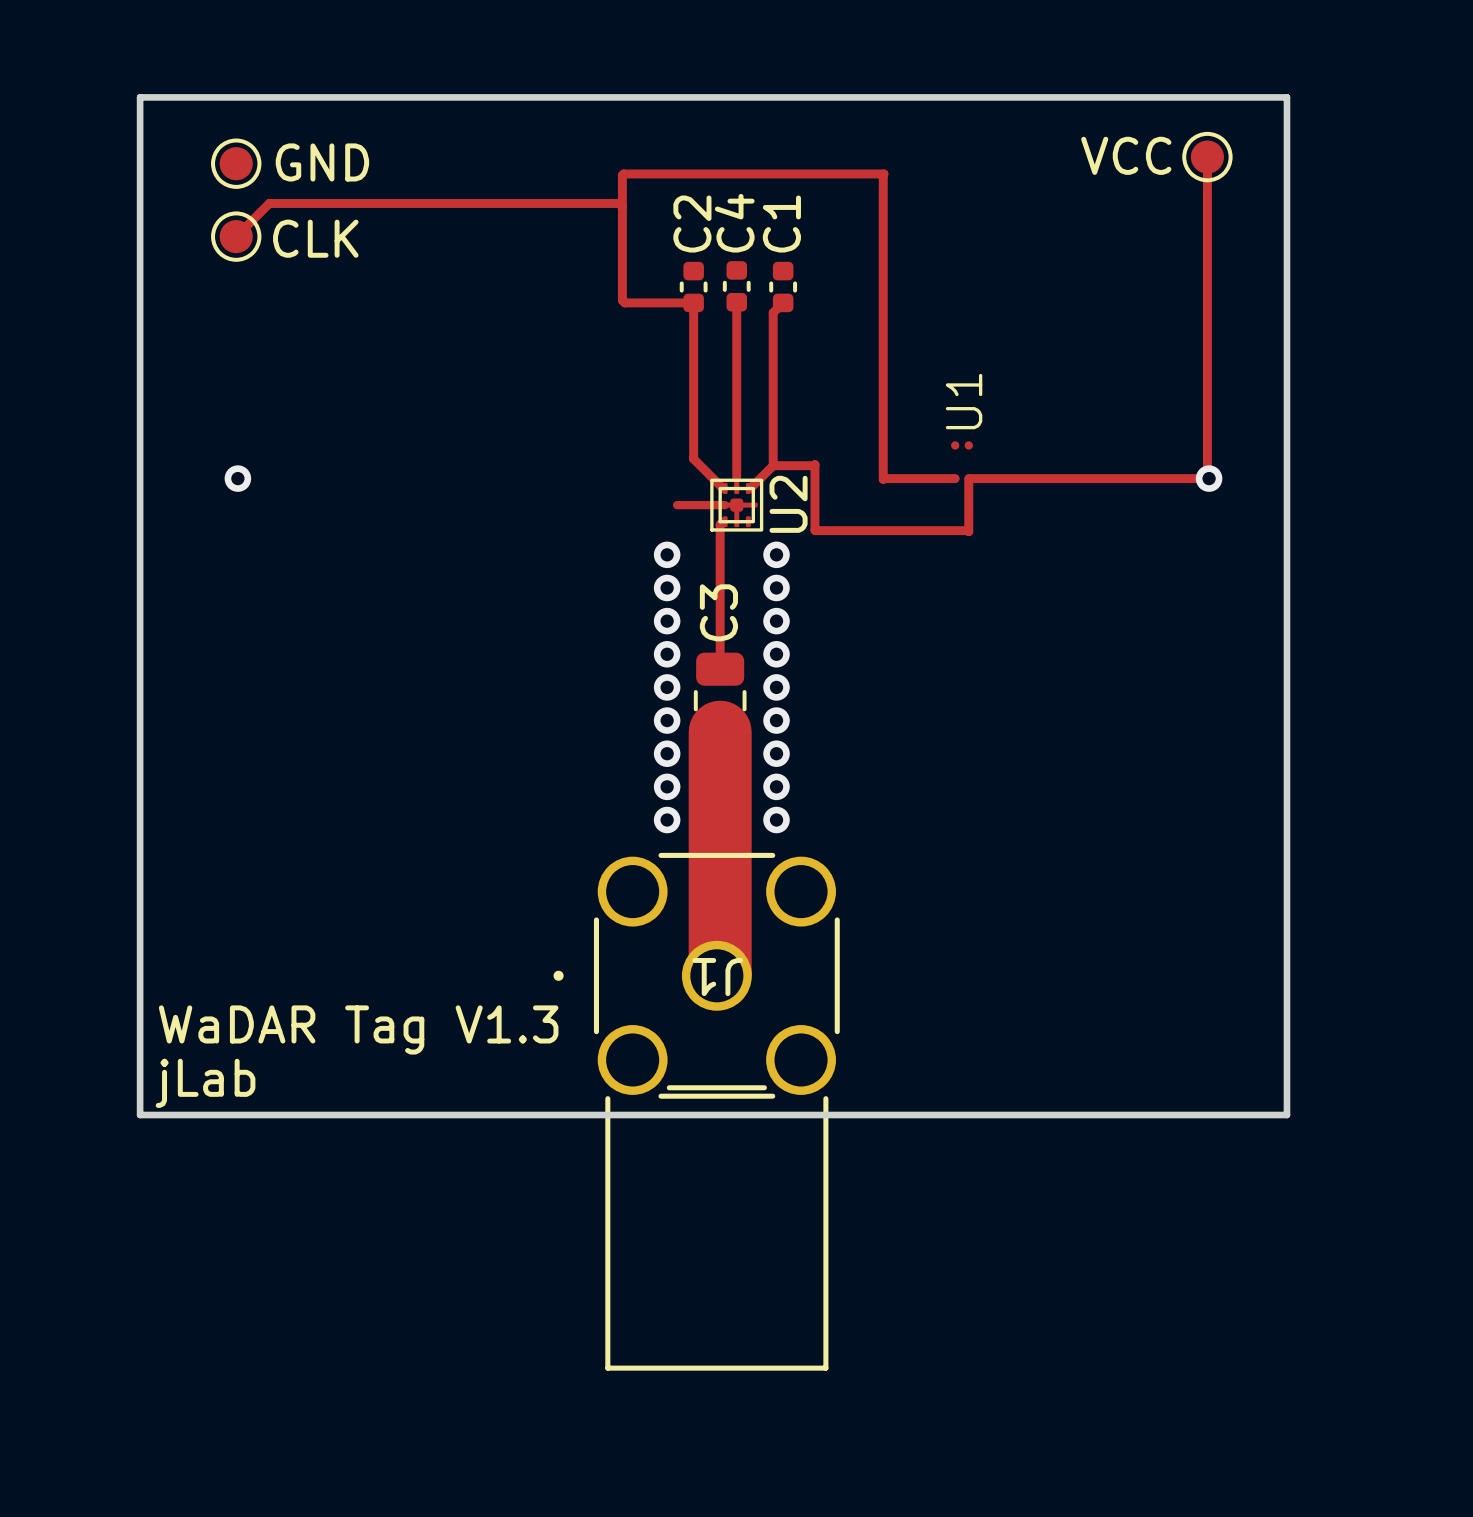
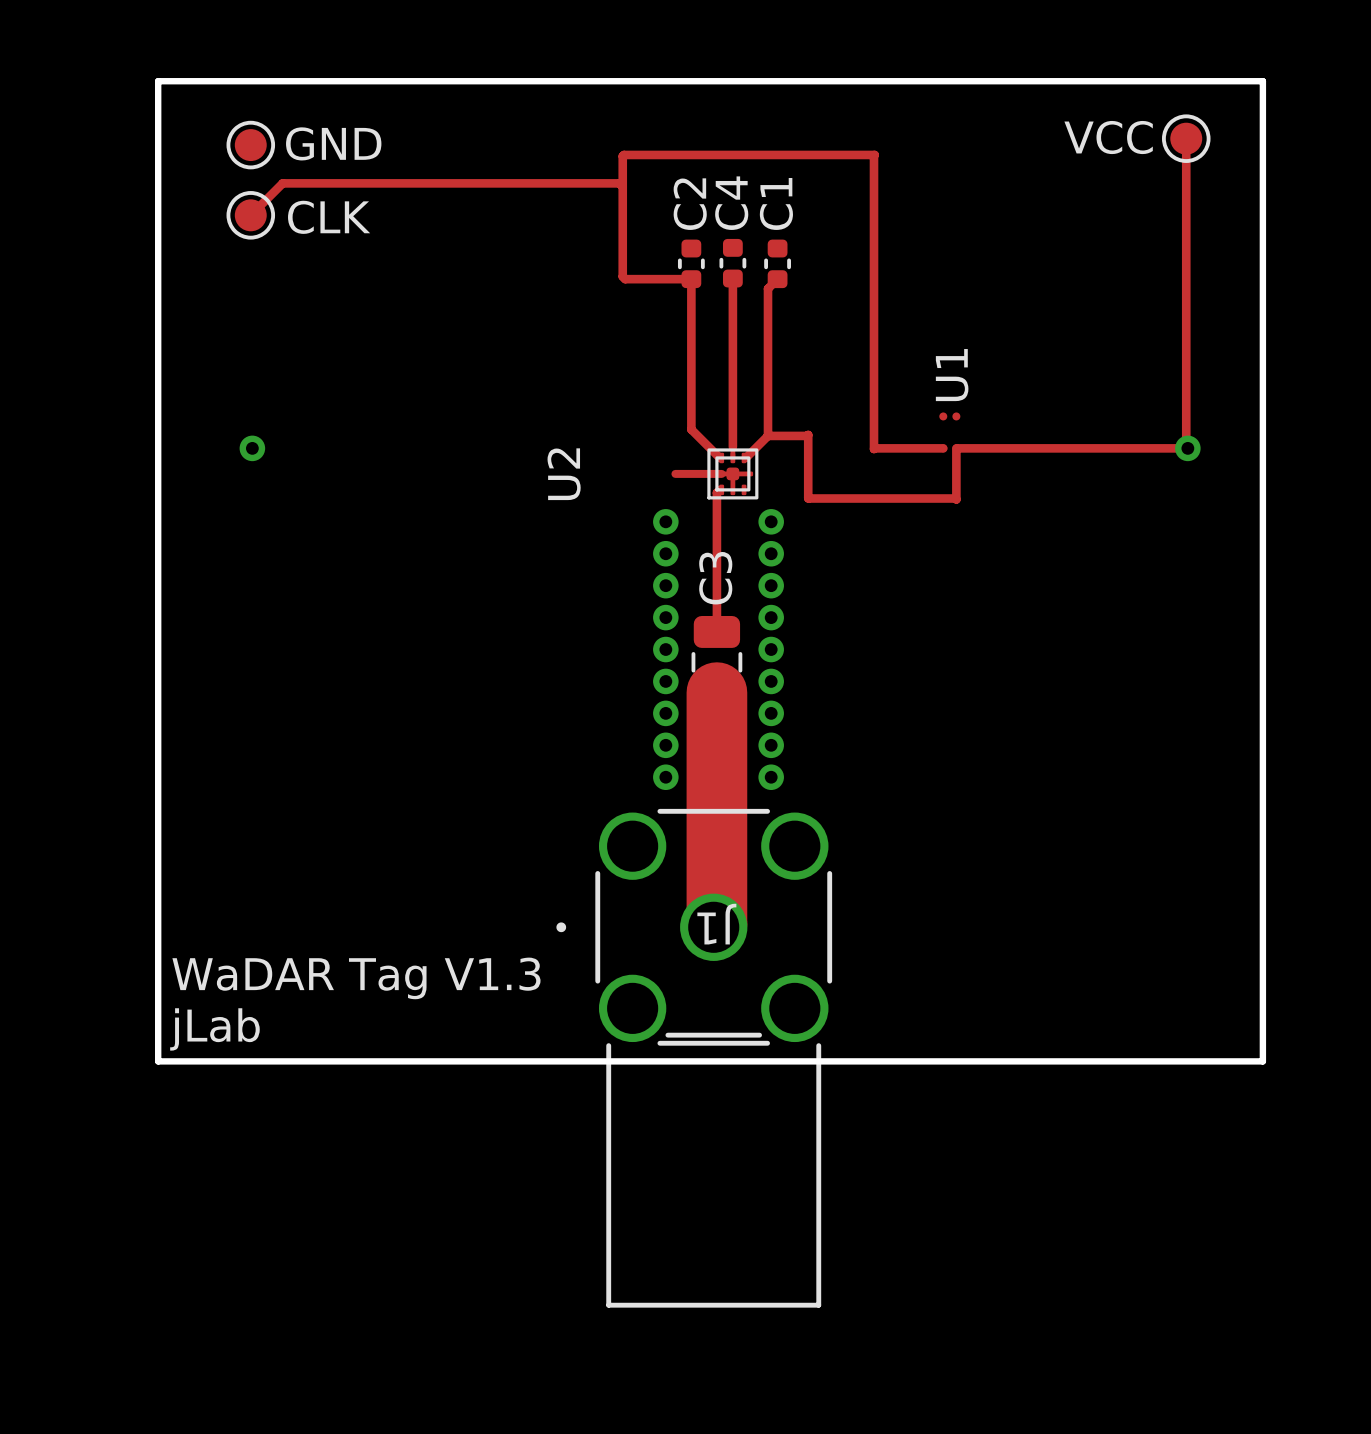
U2 name position: U2 (788, 504) -> U2 (564, 474)

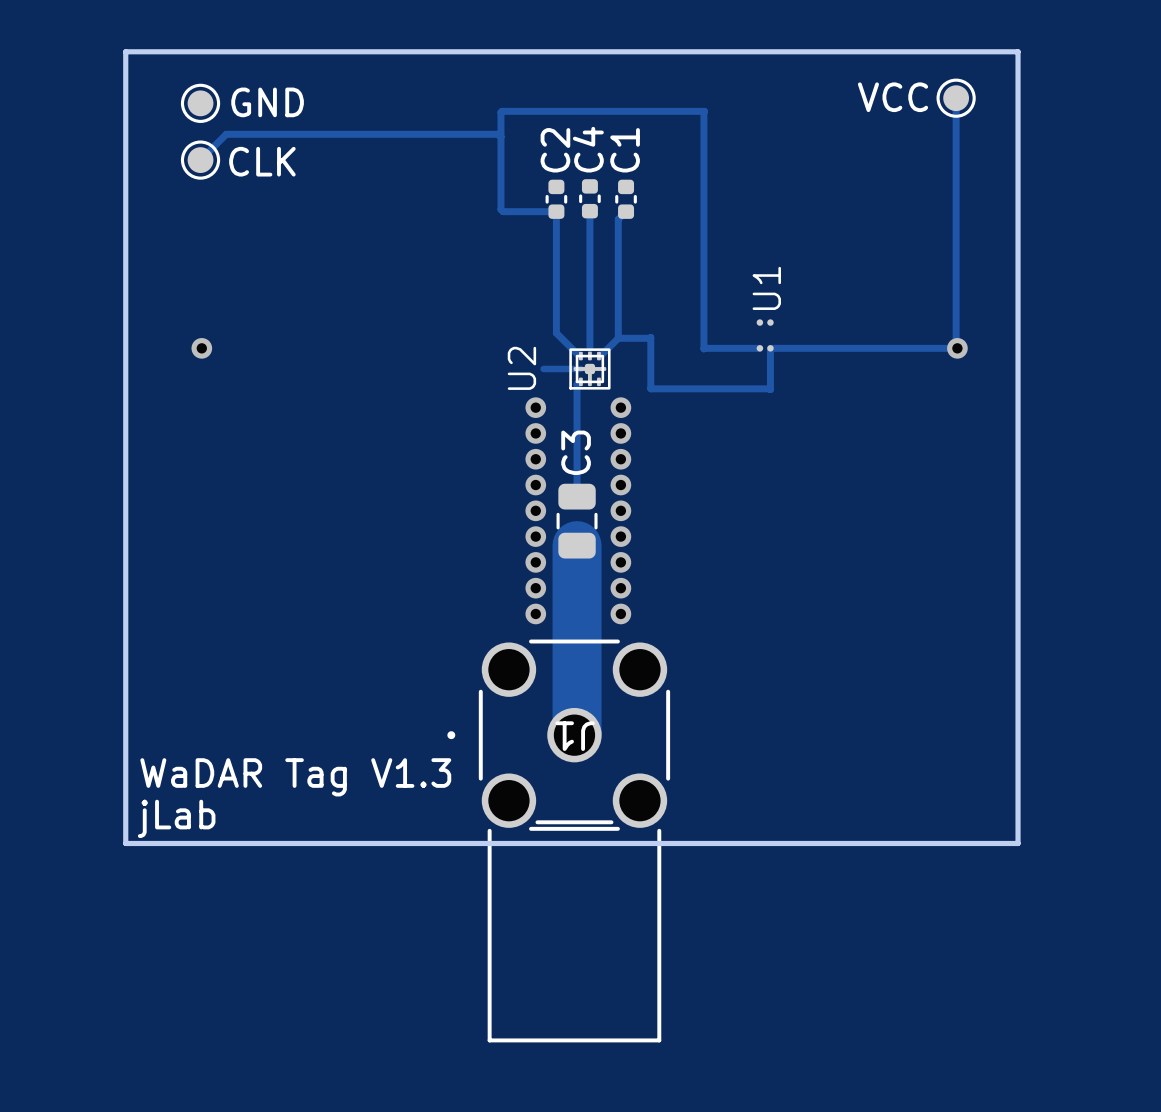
U2 name position: U2 (564, 474) -> U2 (521, 368)

